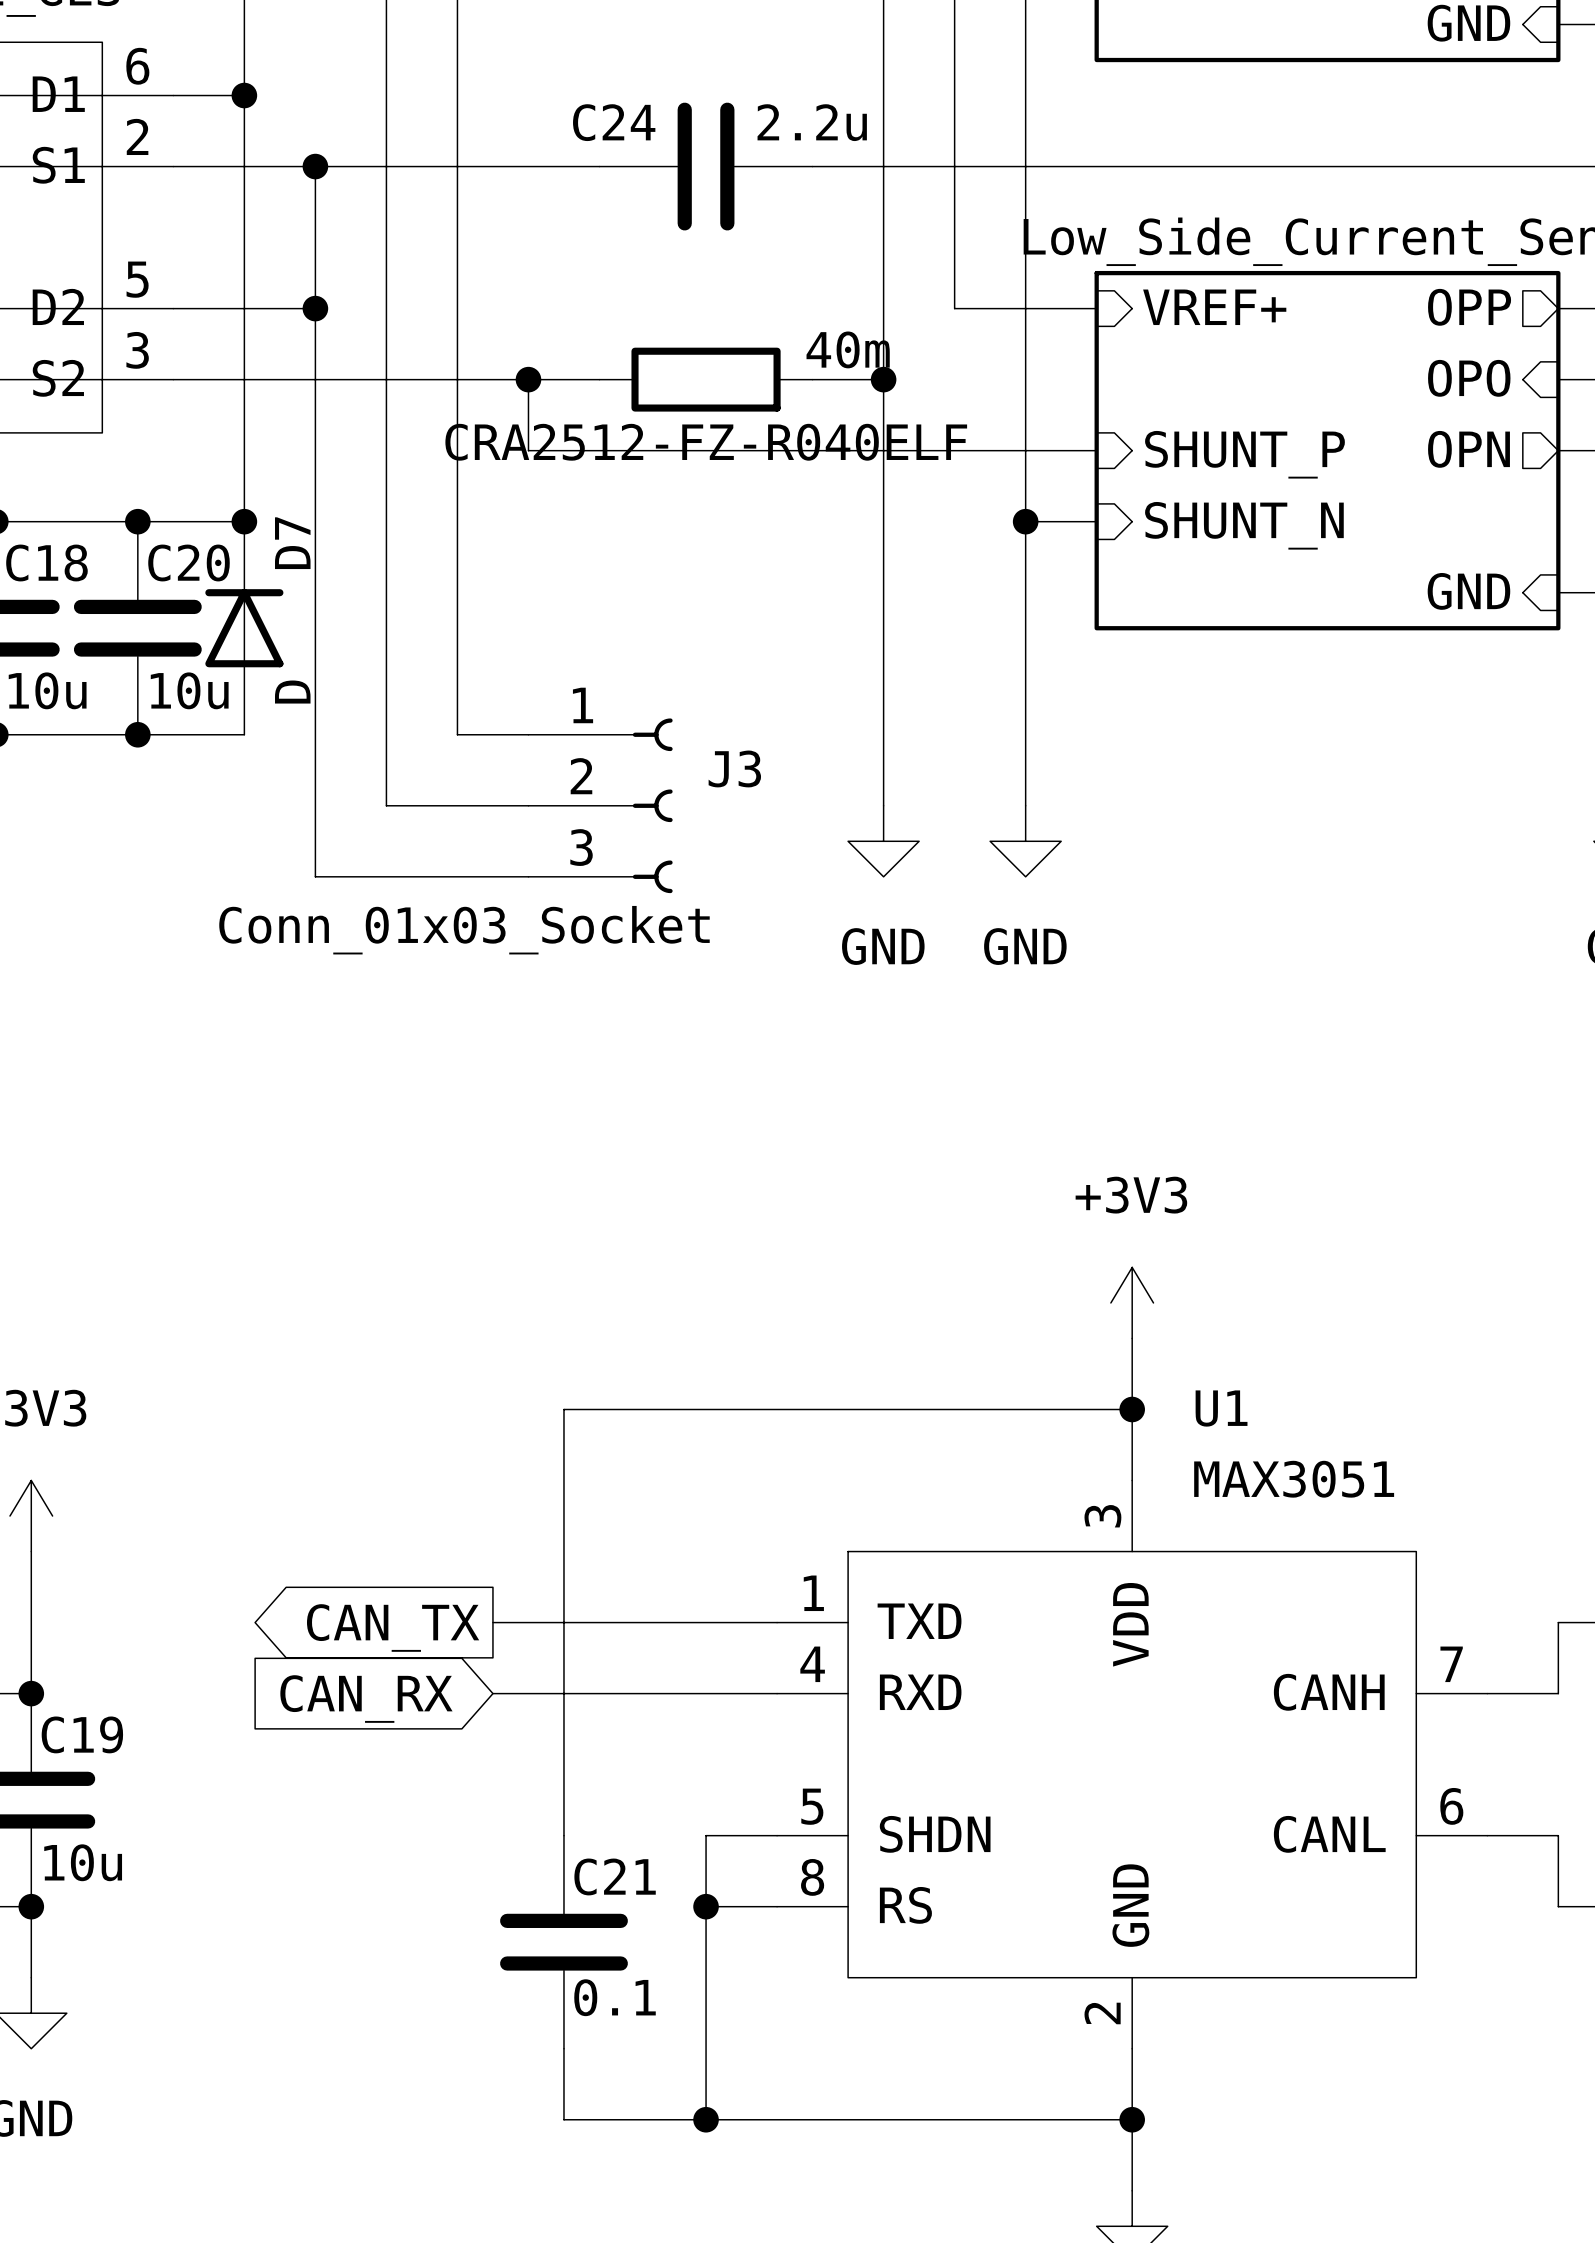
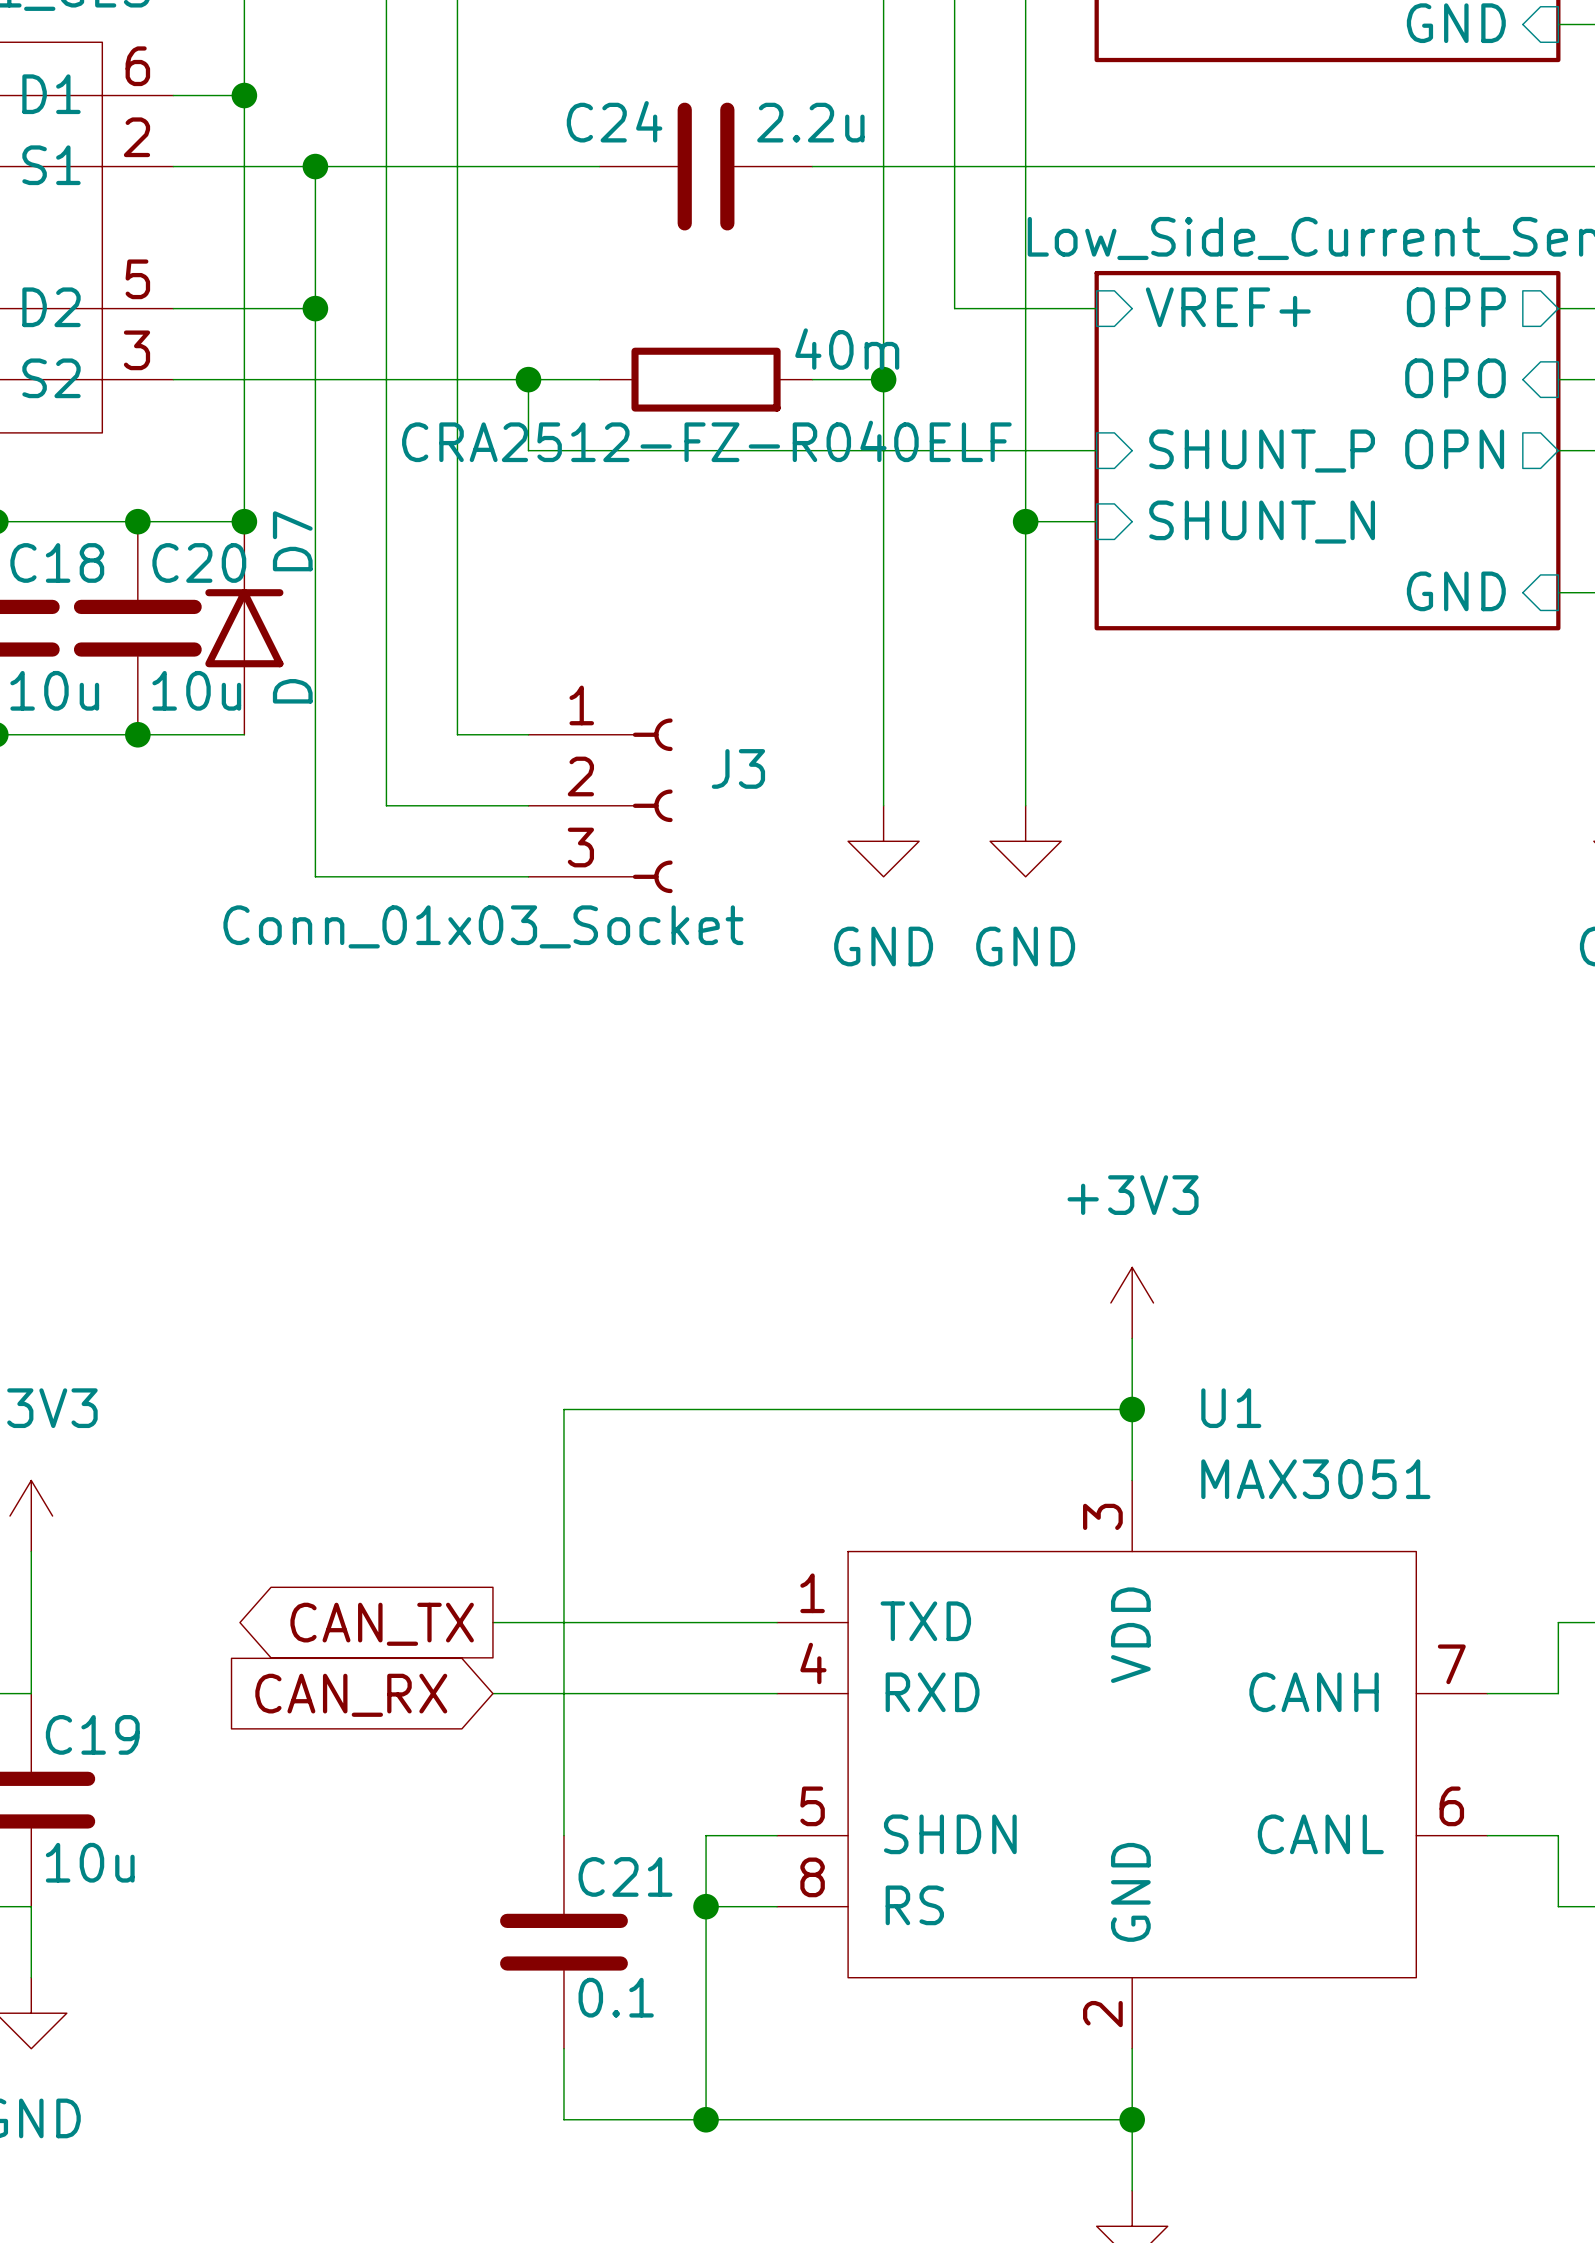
junction: (31, 1693) -> none
junction: (31, 1906) -> none

